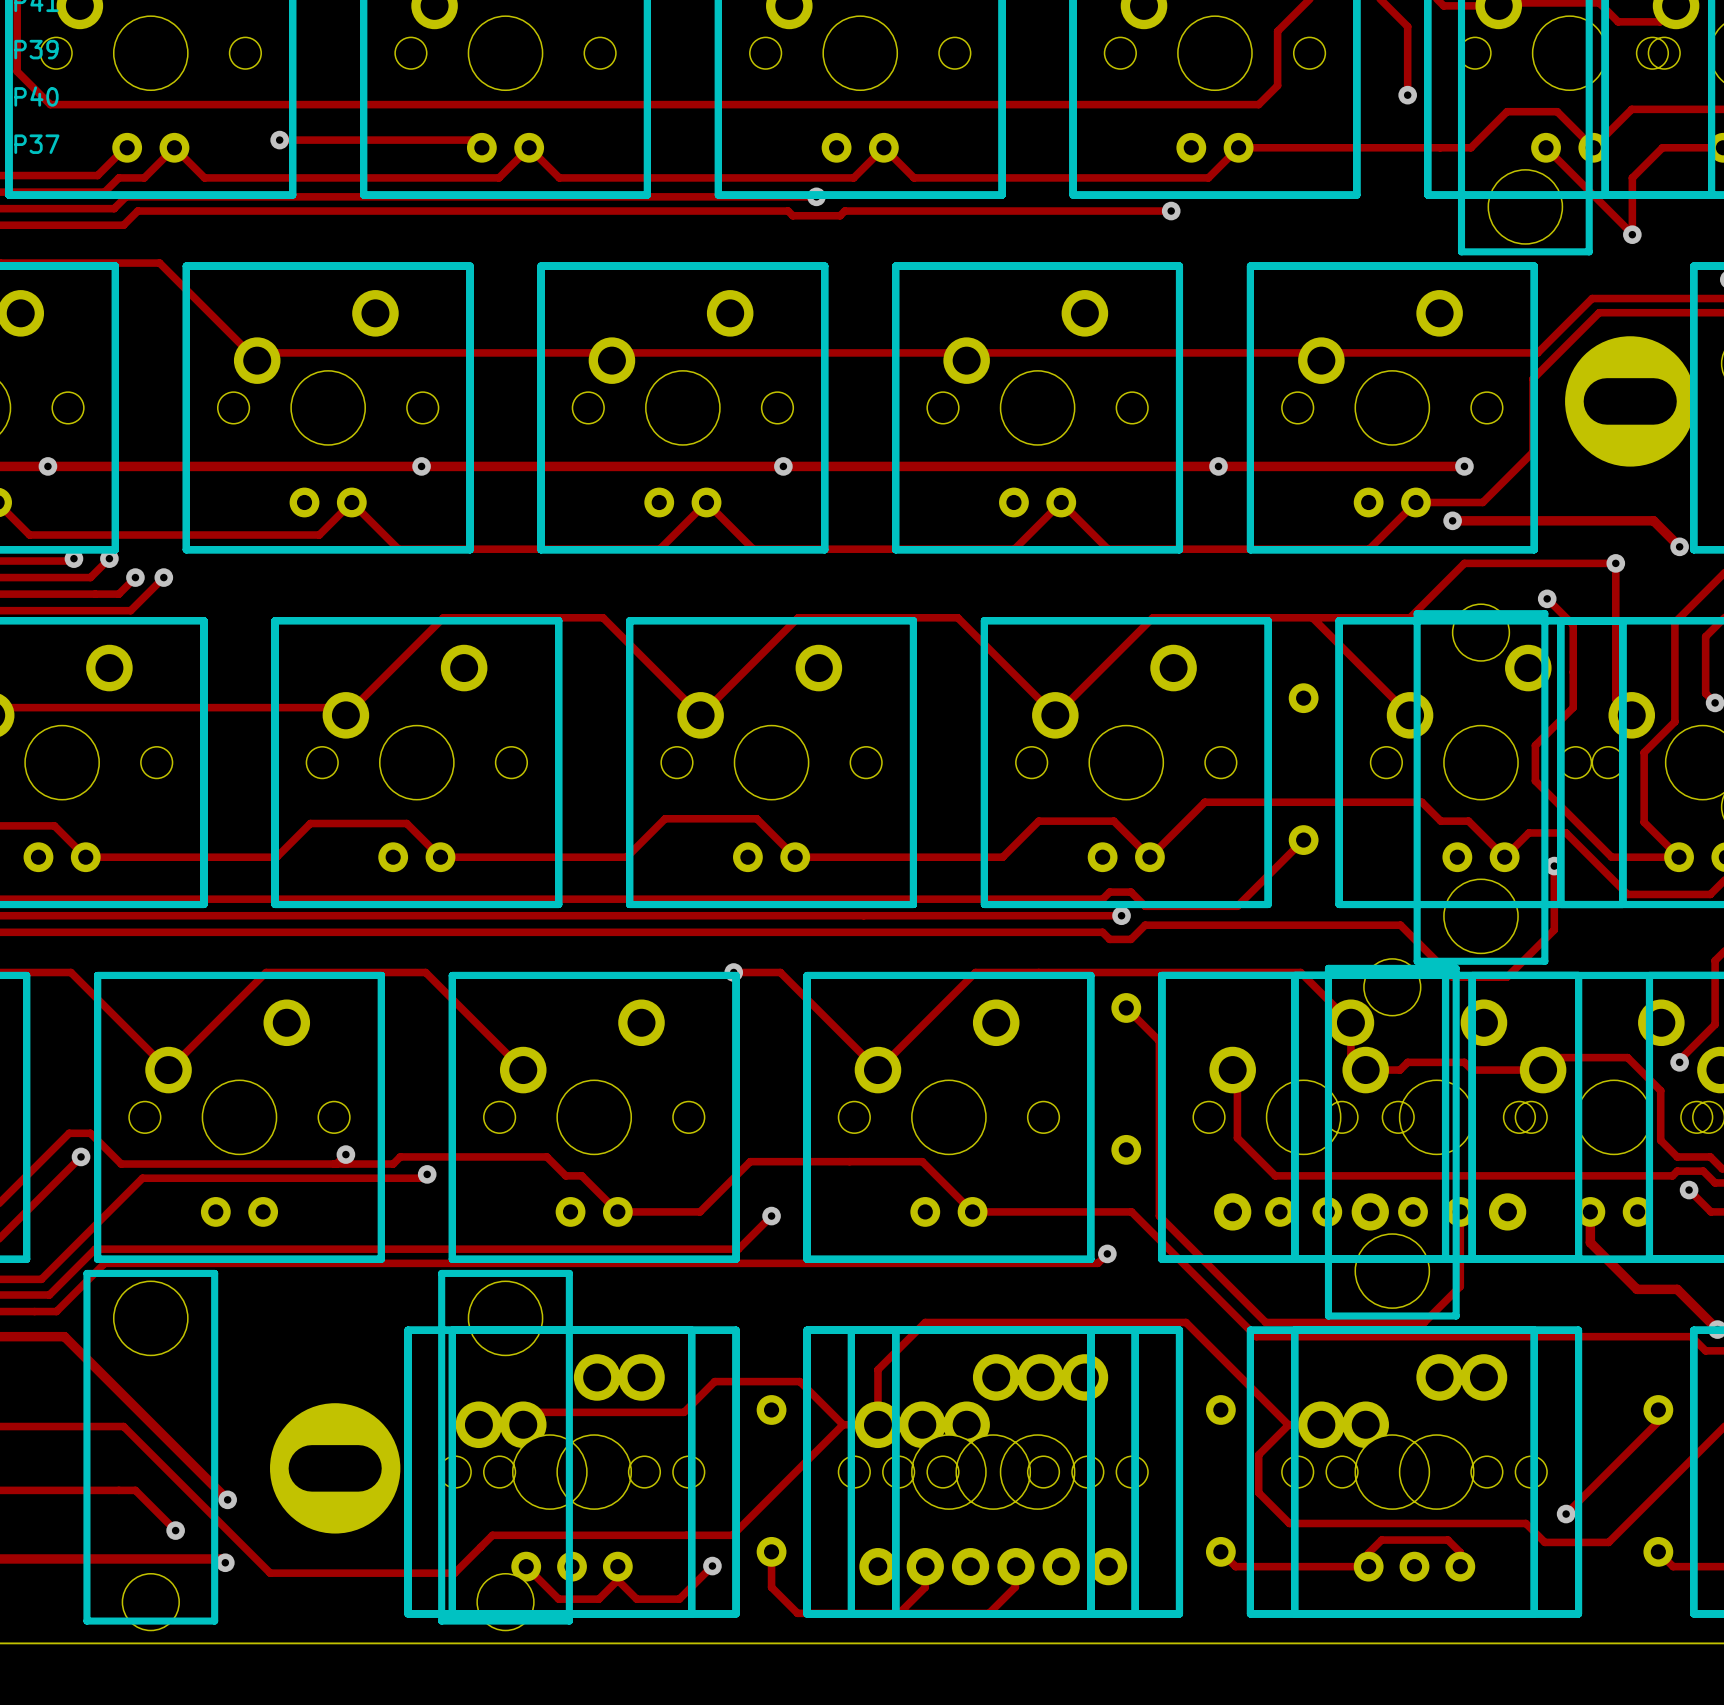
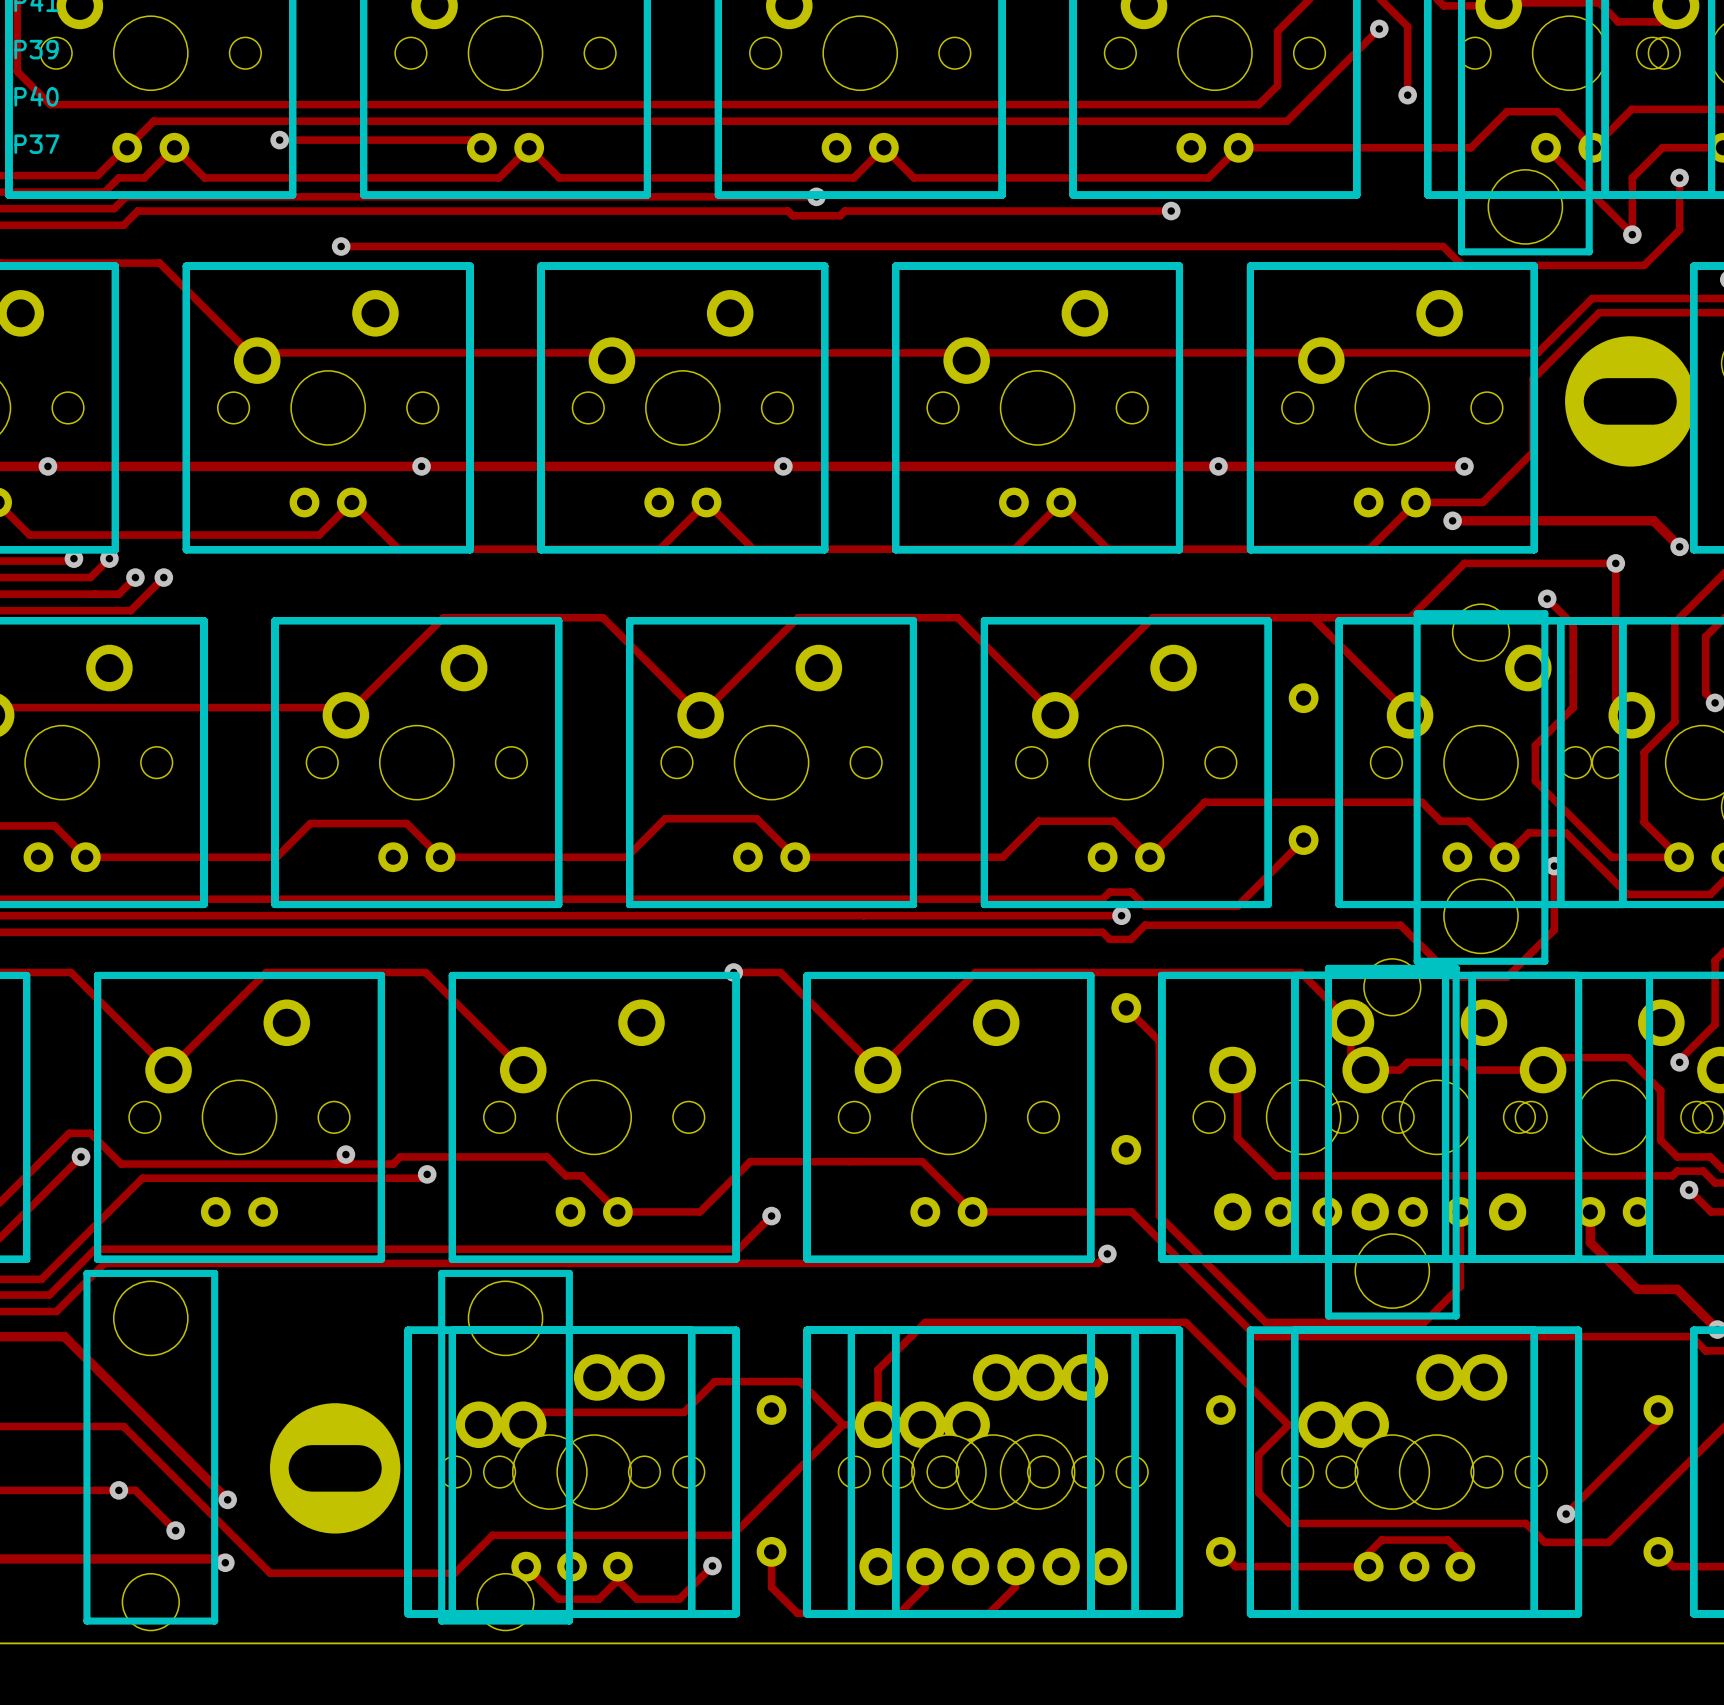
track: none -> (1379, 28) (1287, 121) (153, 121) (127, 147)
via: none -> (1379, 28)
track: none -> (1679, 177) (1679, 229) (1644, 265) (1462, 265) (1443, 246) (341, 246)
via: none -> (1679, 177)
via: none -> (341, 246)
via: none -> (118, 1490)

